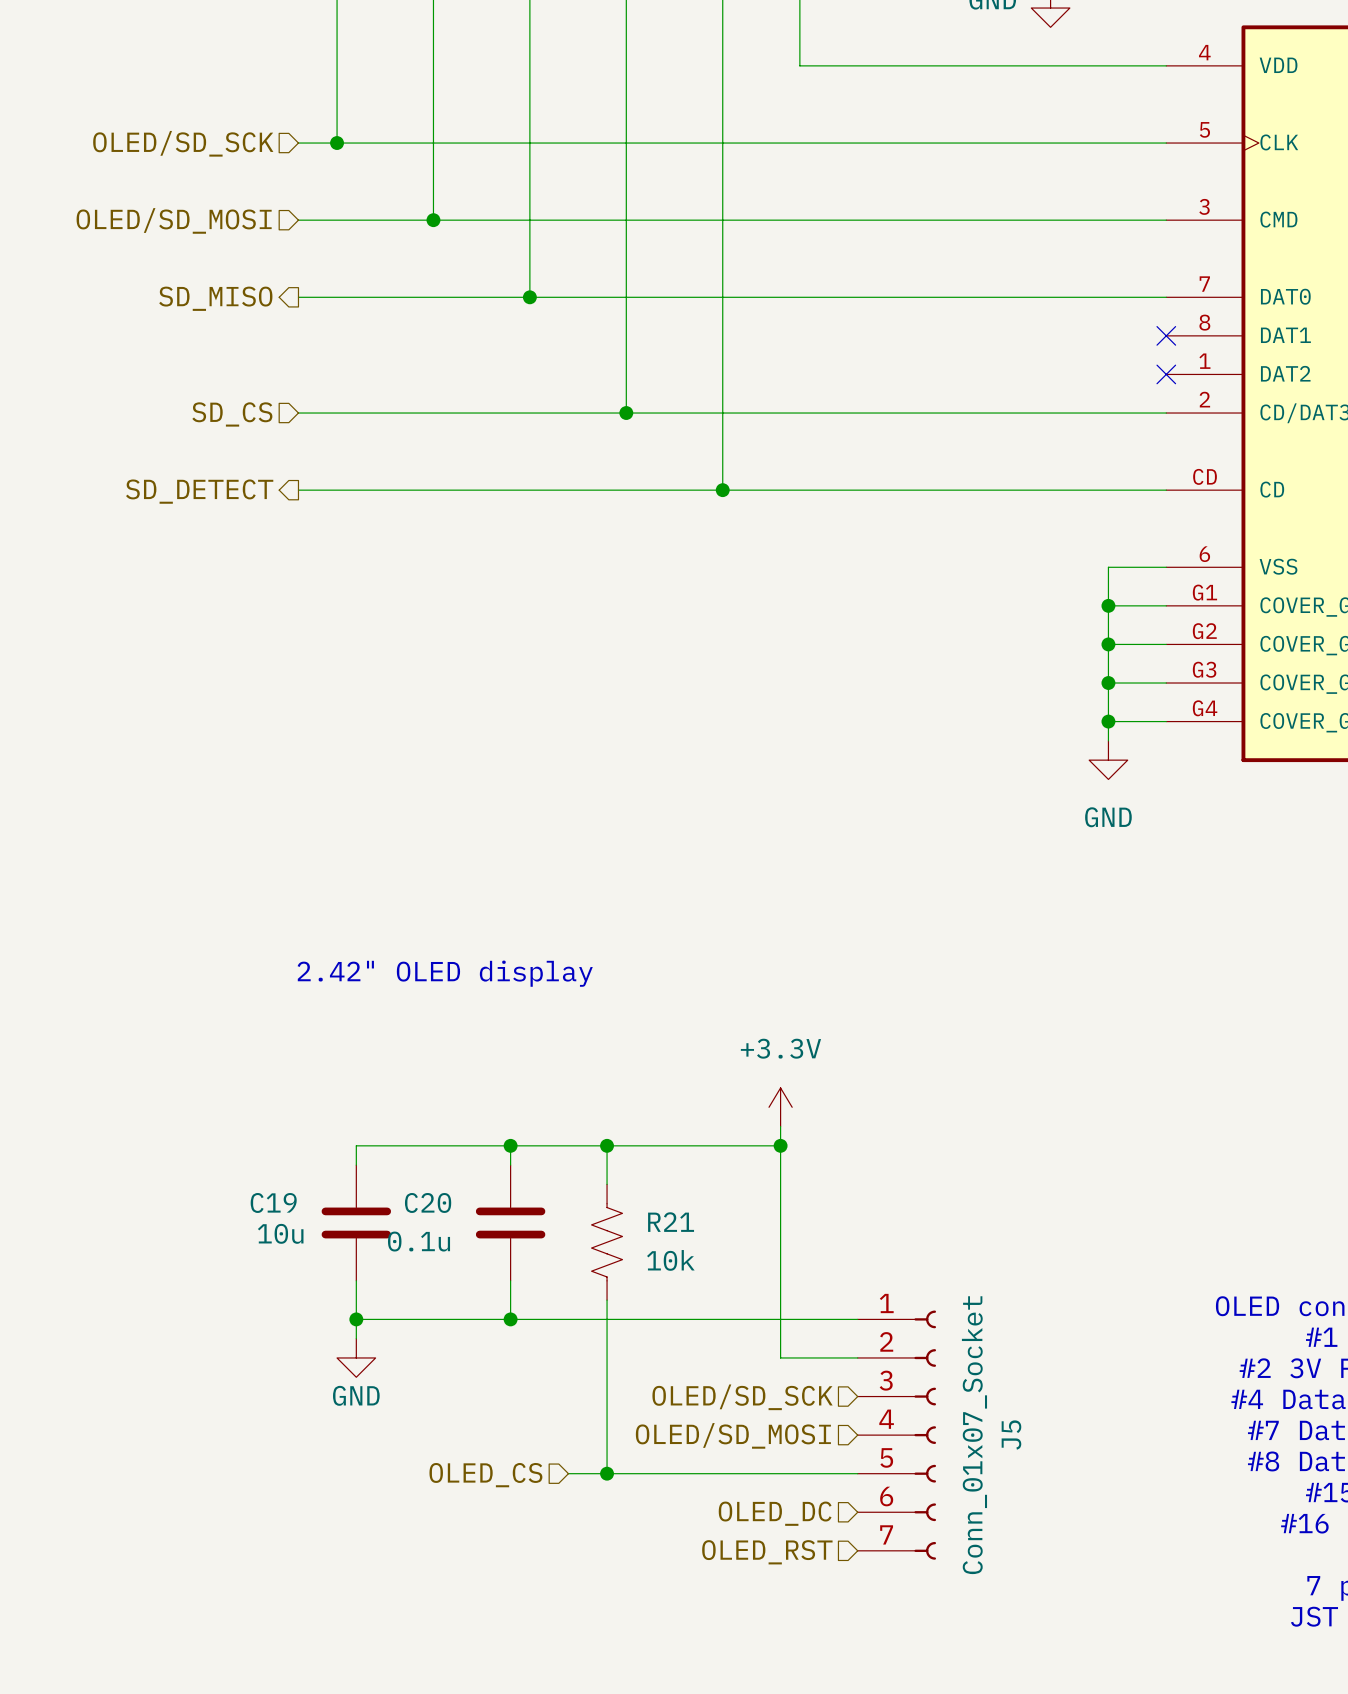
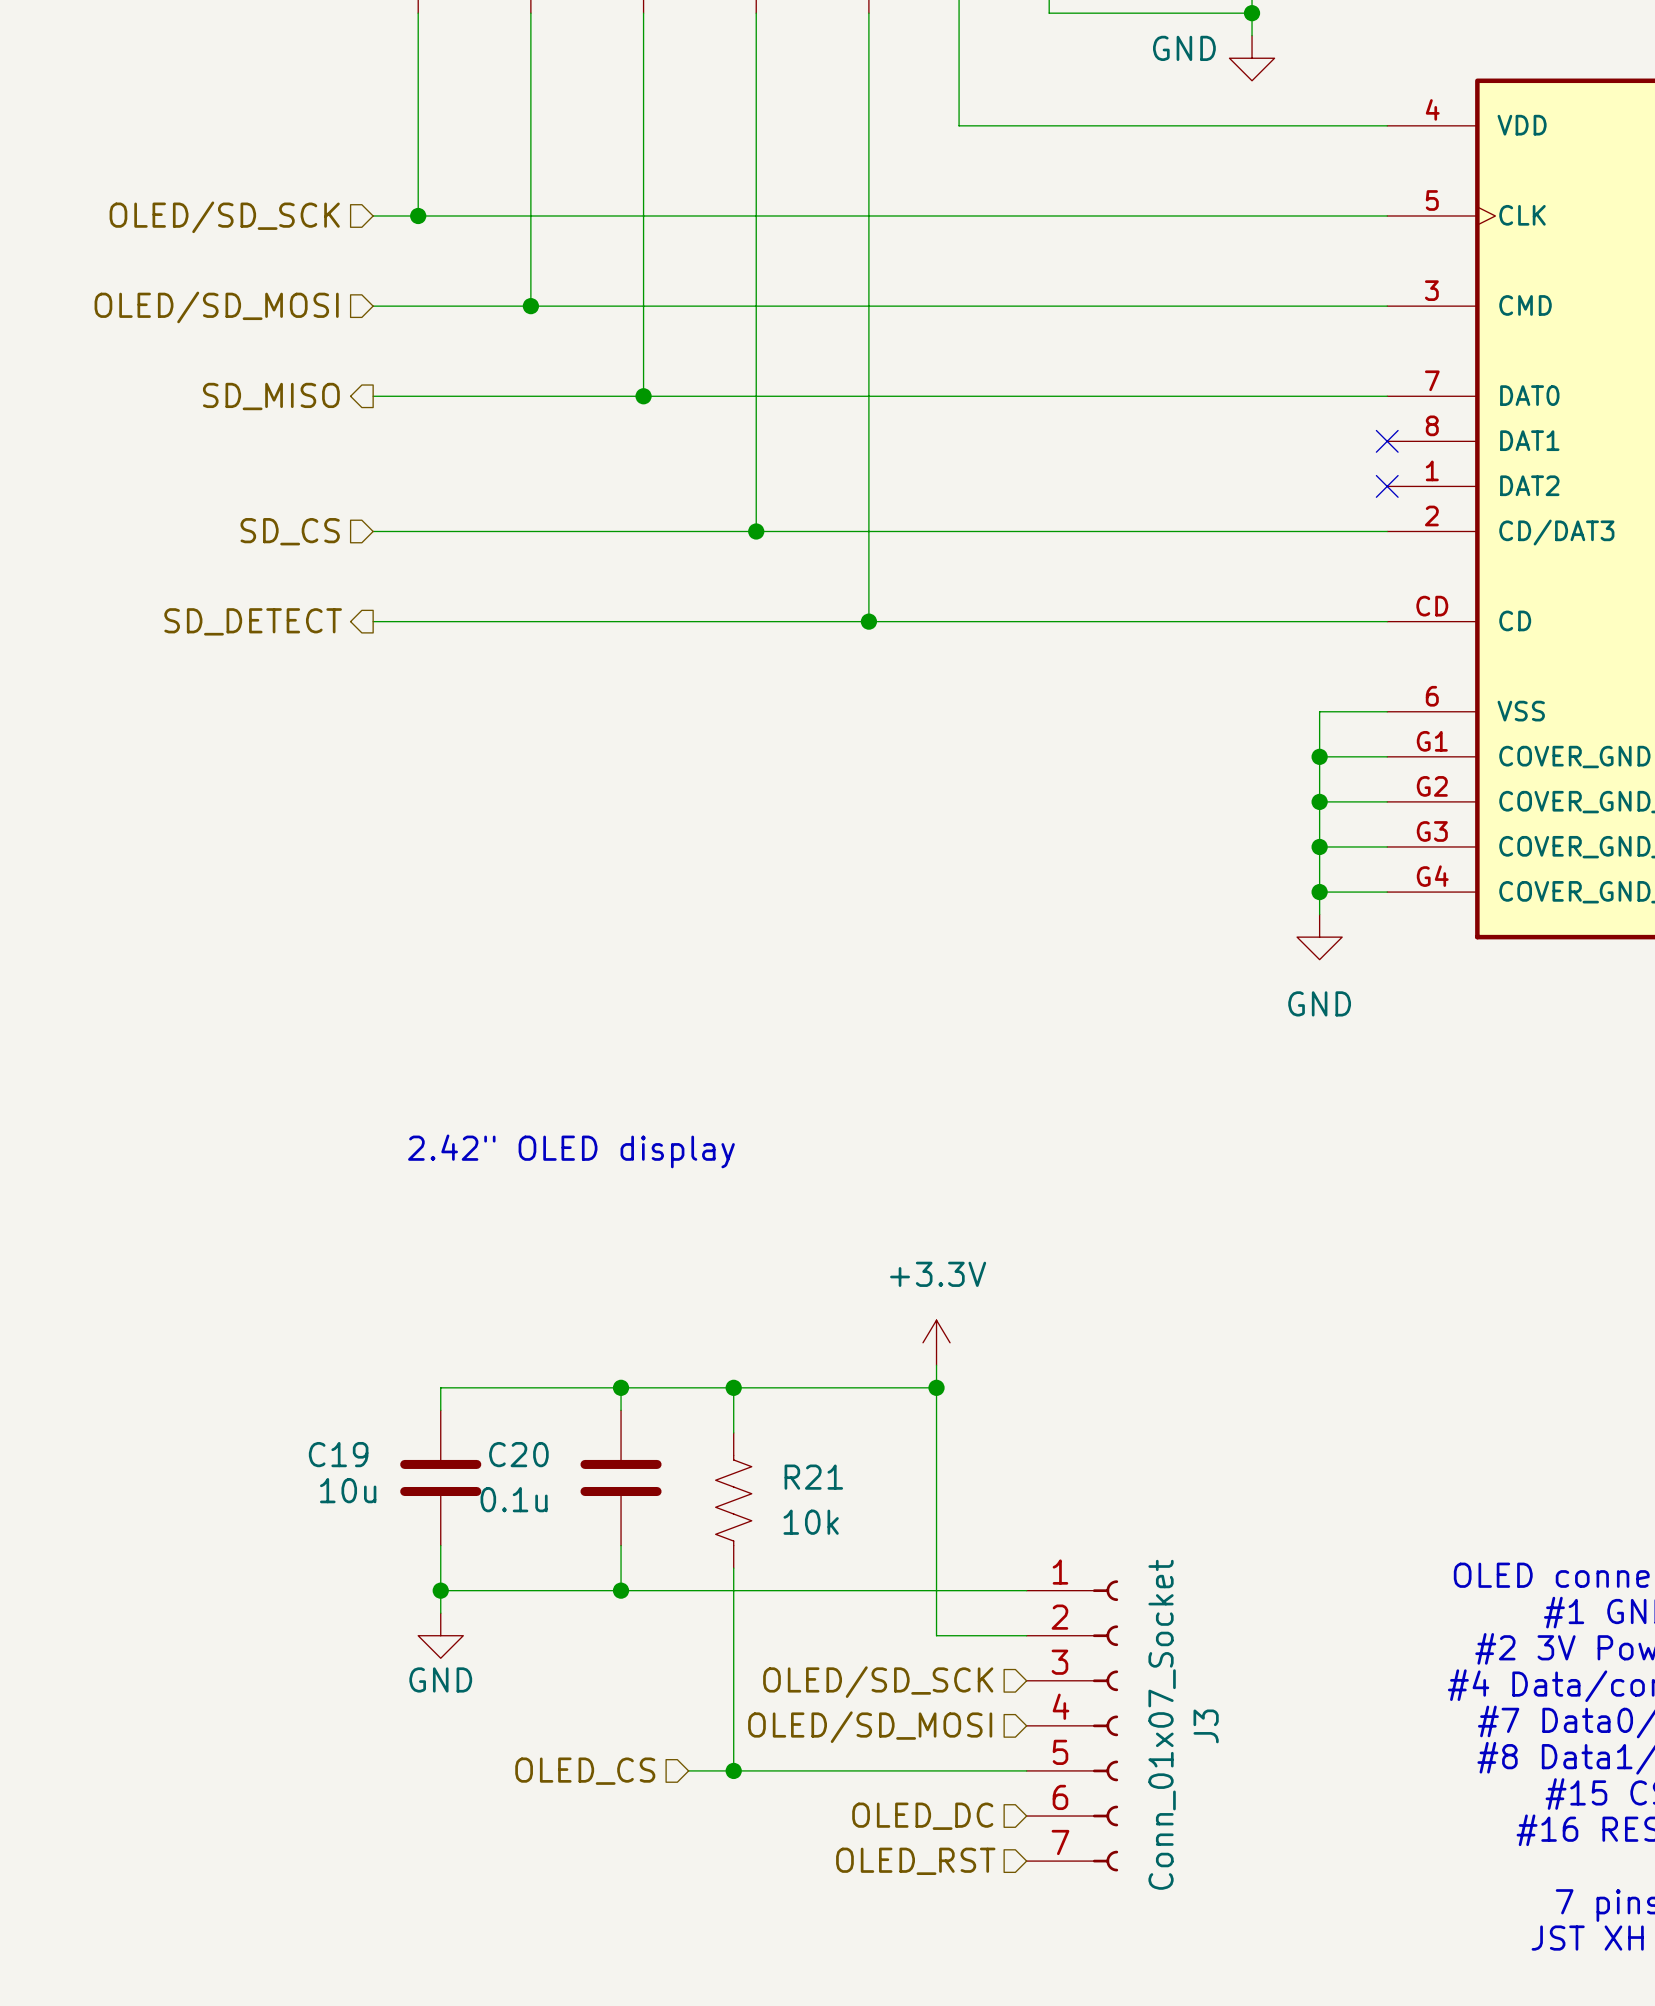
text position: 2.42" OLED display (445, 973) -> 2.42" OLED display (571, 1151)
J5 name: J5 (1011, 1435) -> J3 (1206, 1726)

